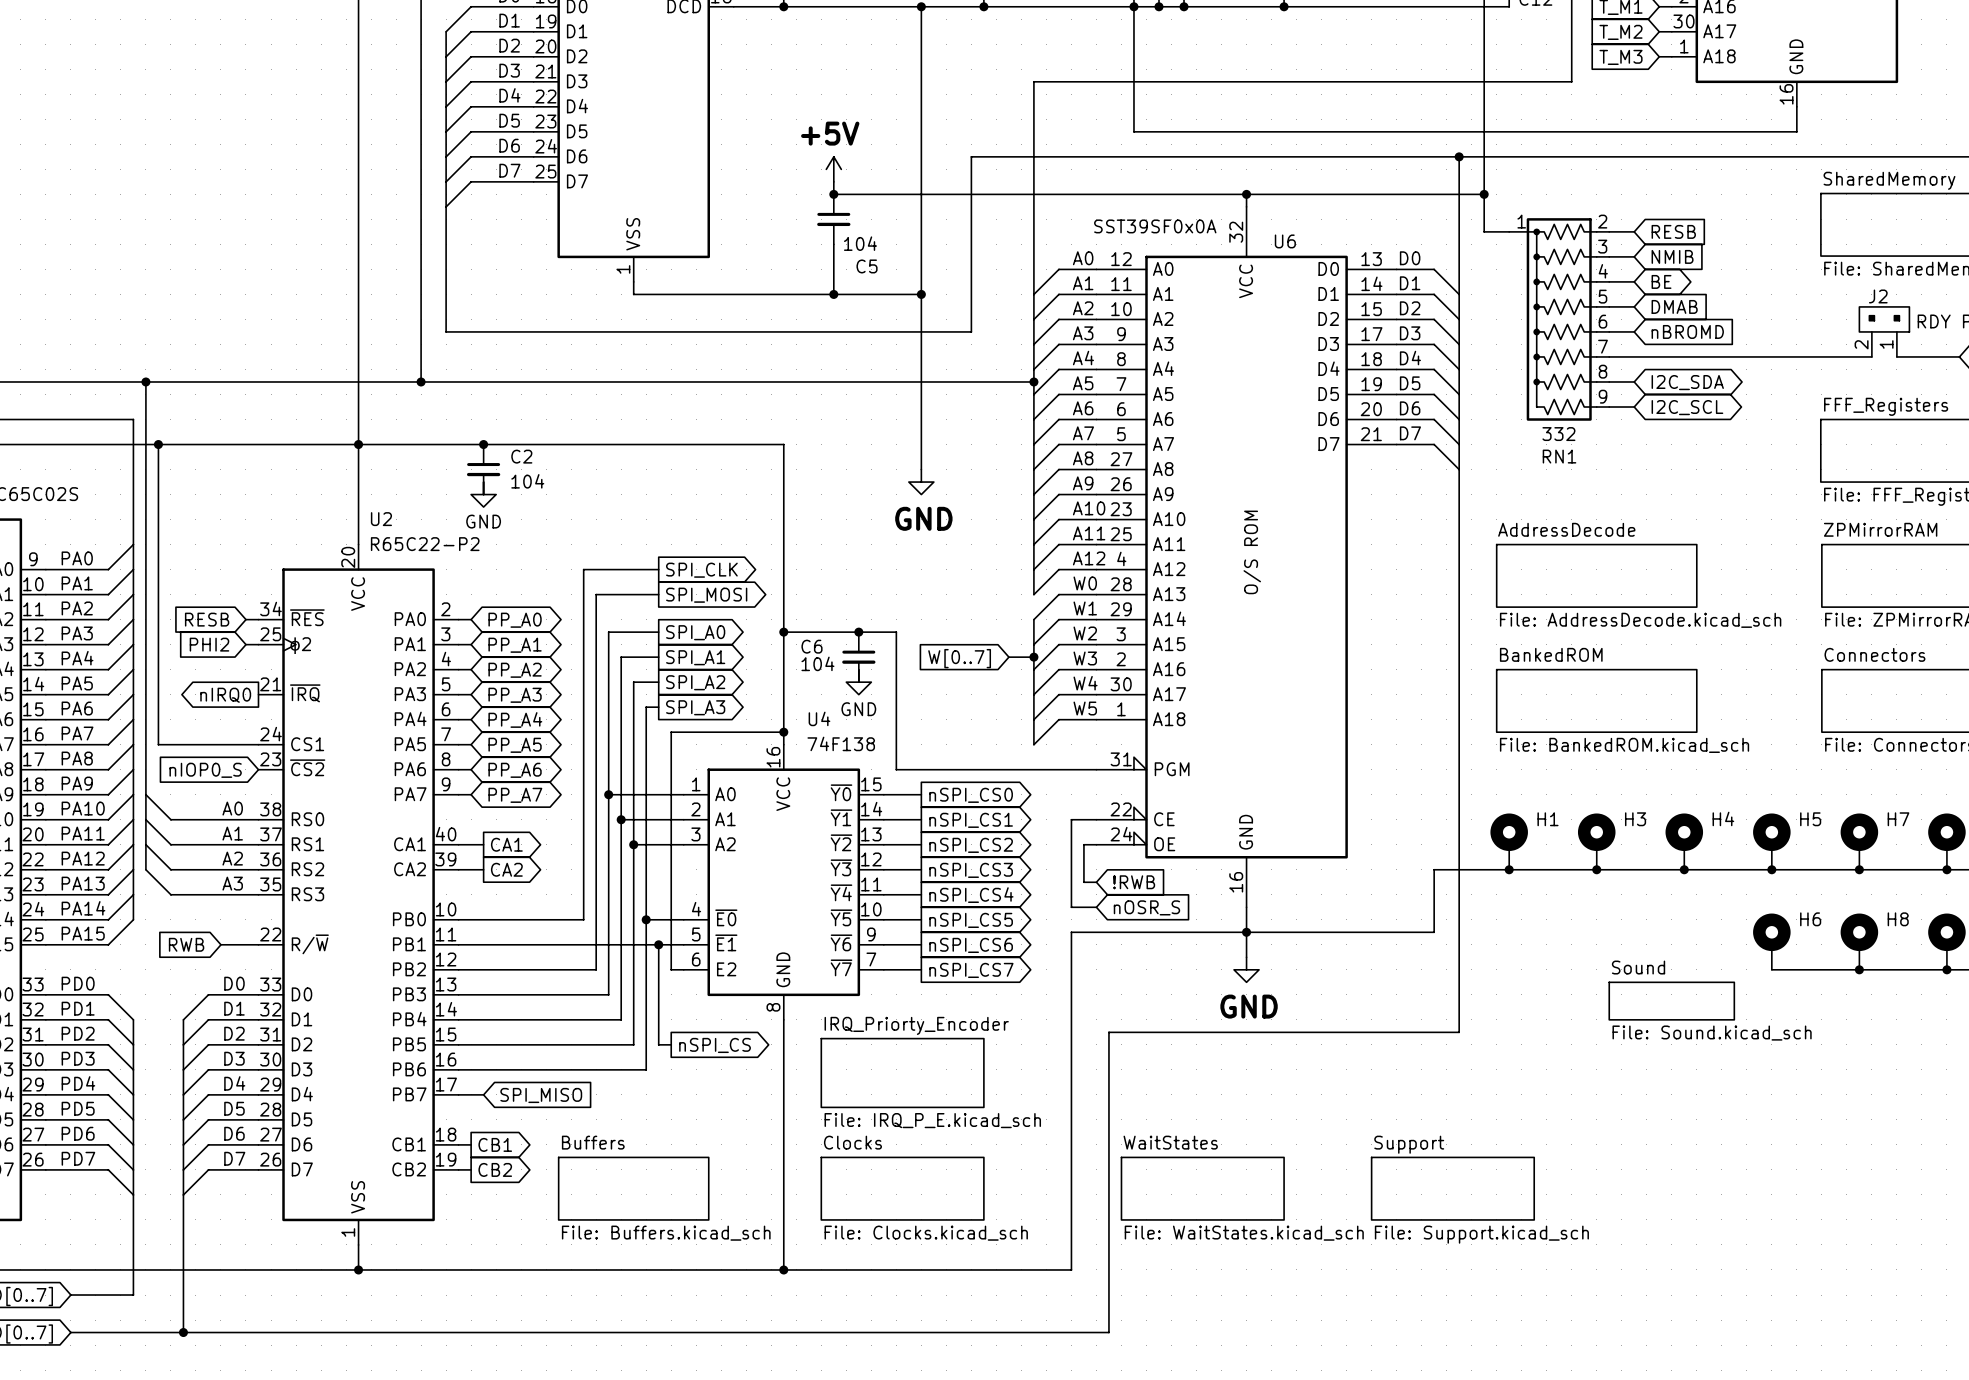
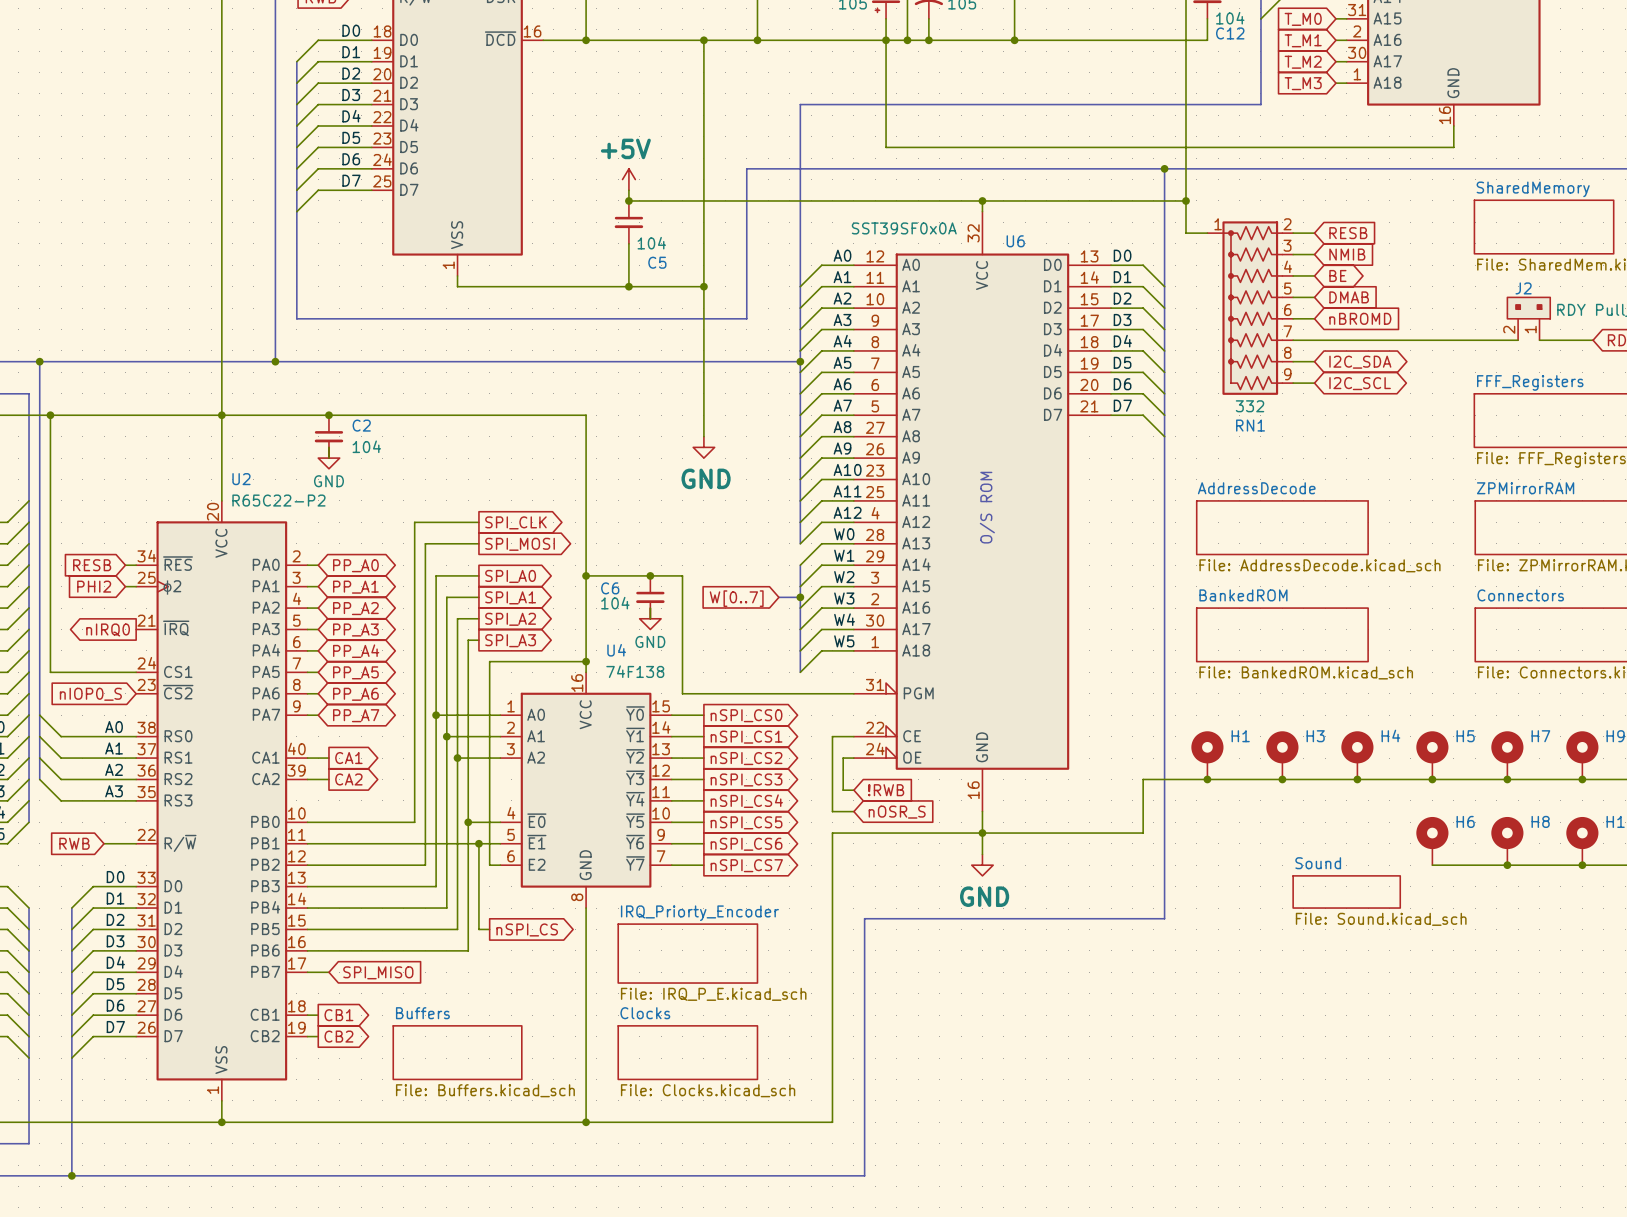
sheet WaitStates: File: WaitStates.kicad_sch (1202, 1188) -> none
sheet Support: File: Support.kicad_sch (1452, 1188) -> none

